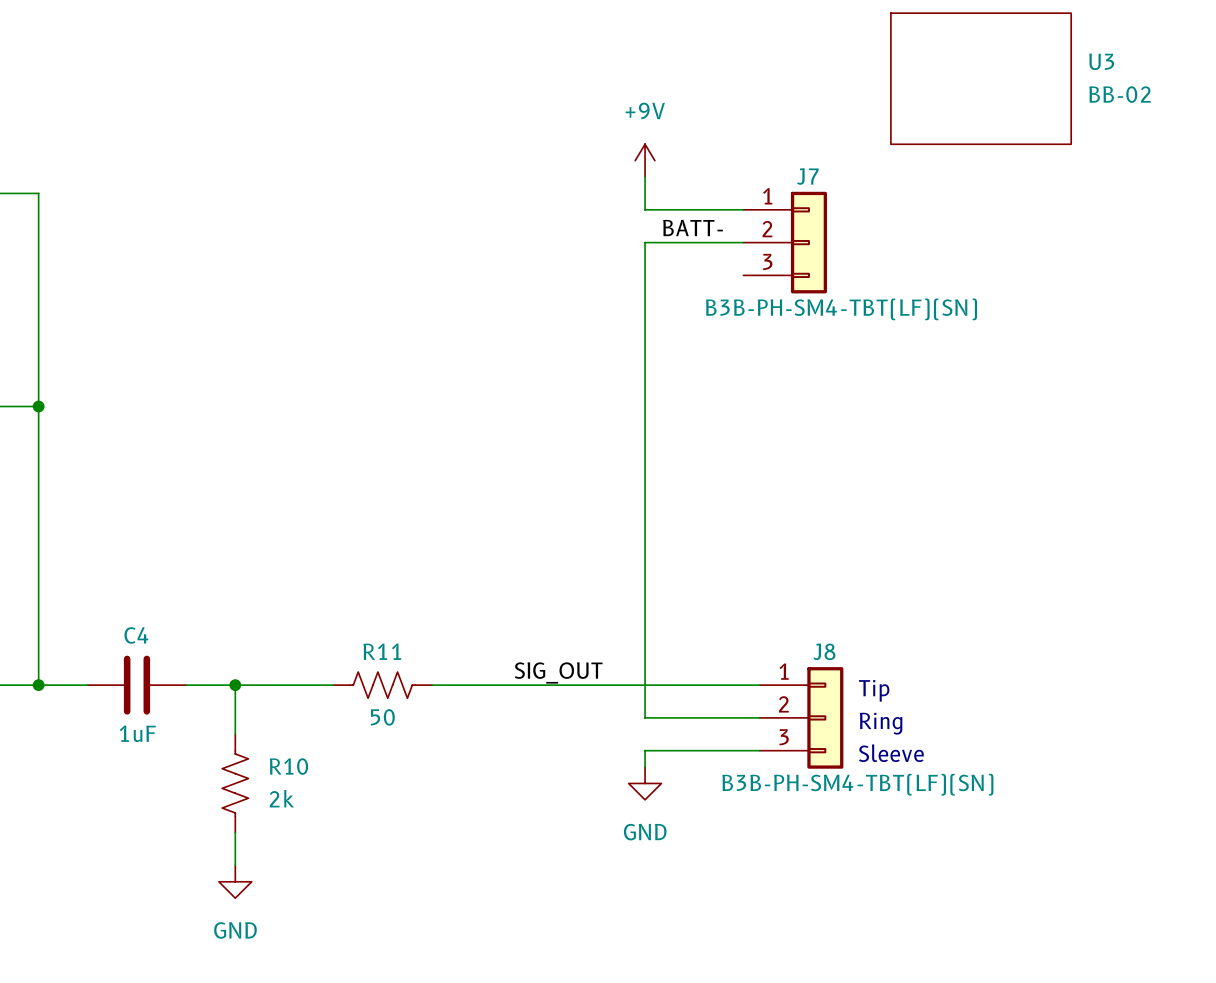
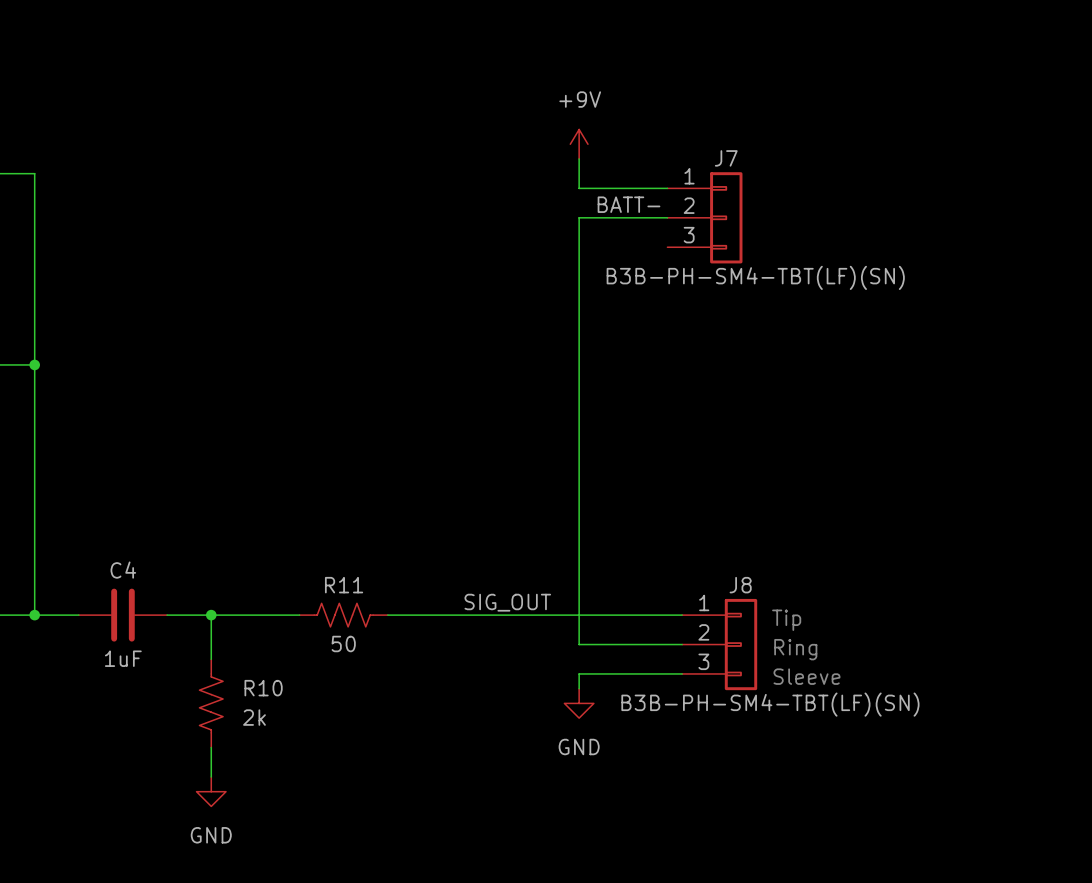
U3: BB-02 (981, 78) -> none

